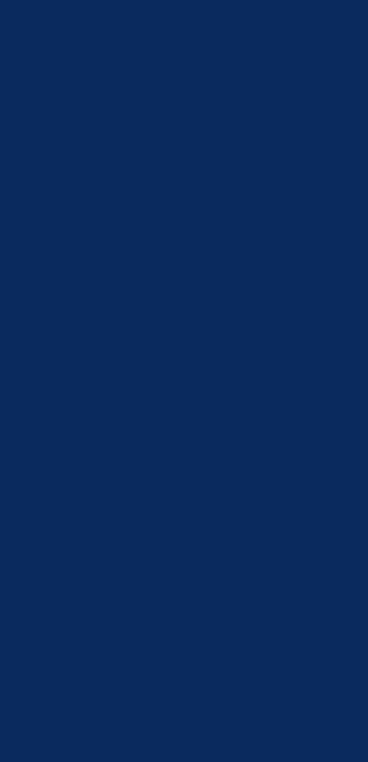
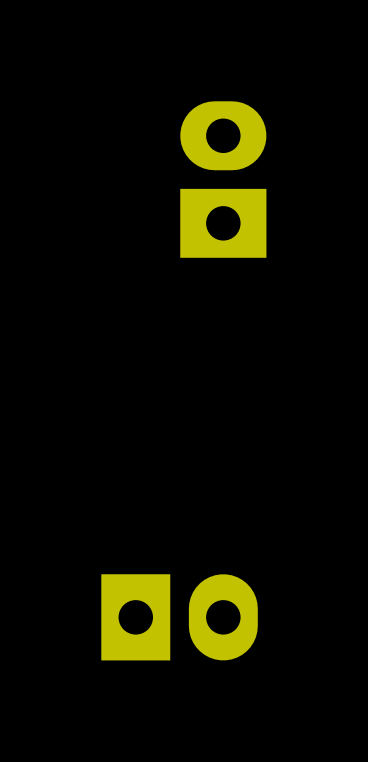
part: none -> (223, 179)
part: none -> (179, 617)

